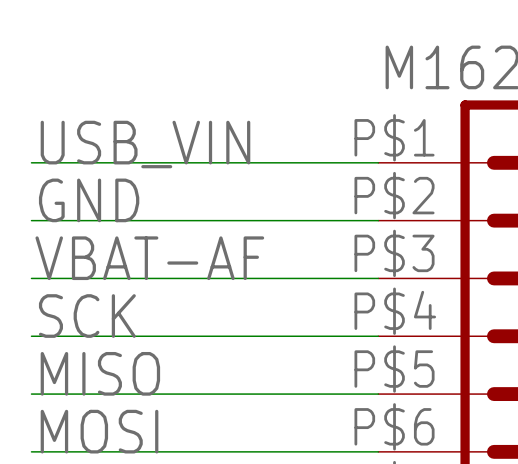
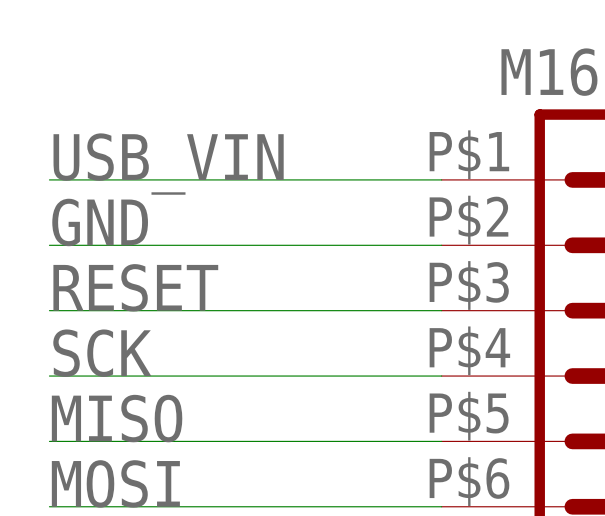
label: VBAT-AF (149, 258) -> RESET (135, 287)

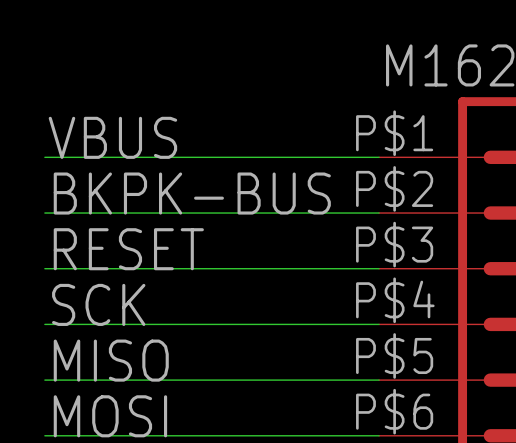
label: USB_VIN (168, 164) -> VBUS (112, 137)
label: GND (100, 222) -> BKPK-BUS (192, 193)

